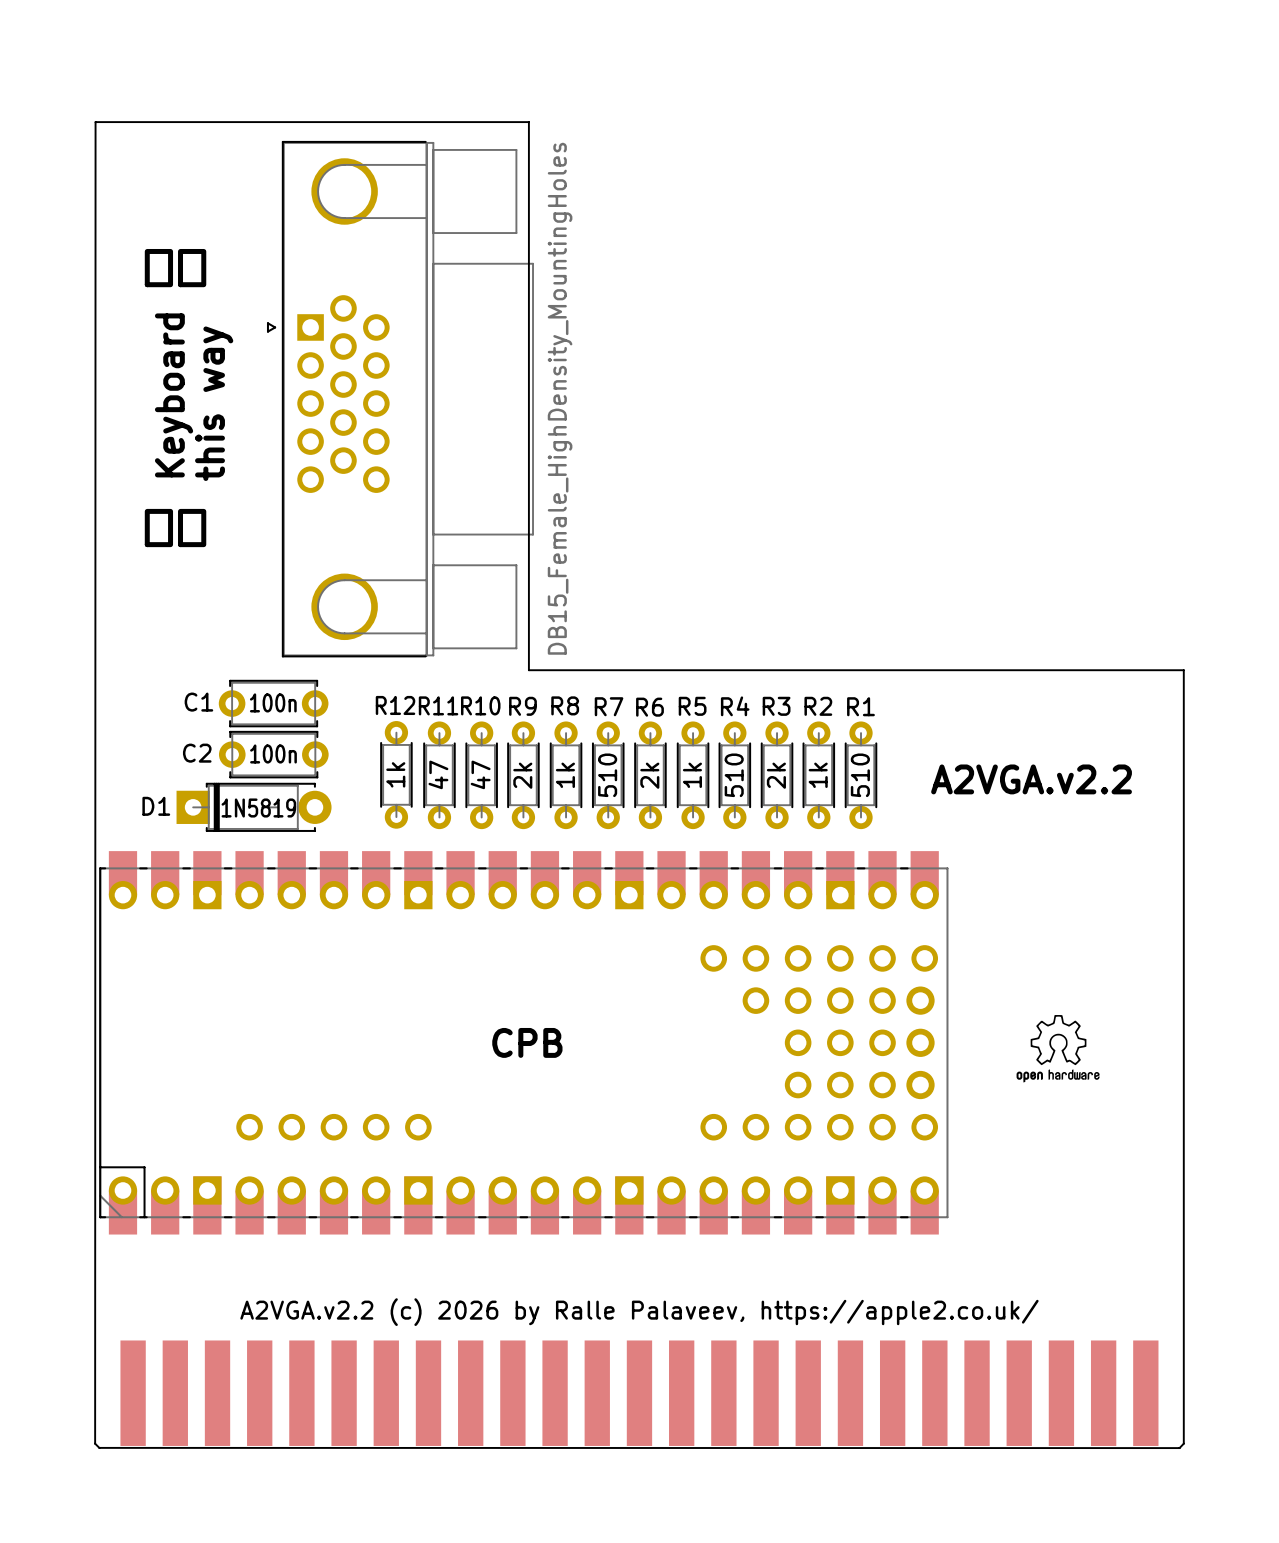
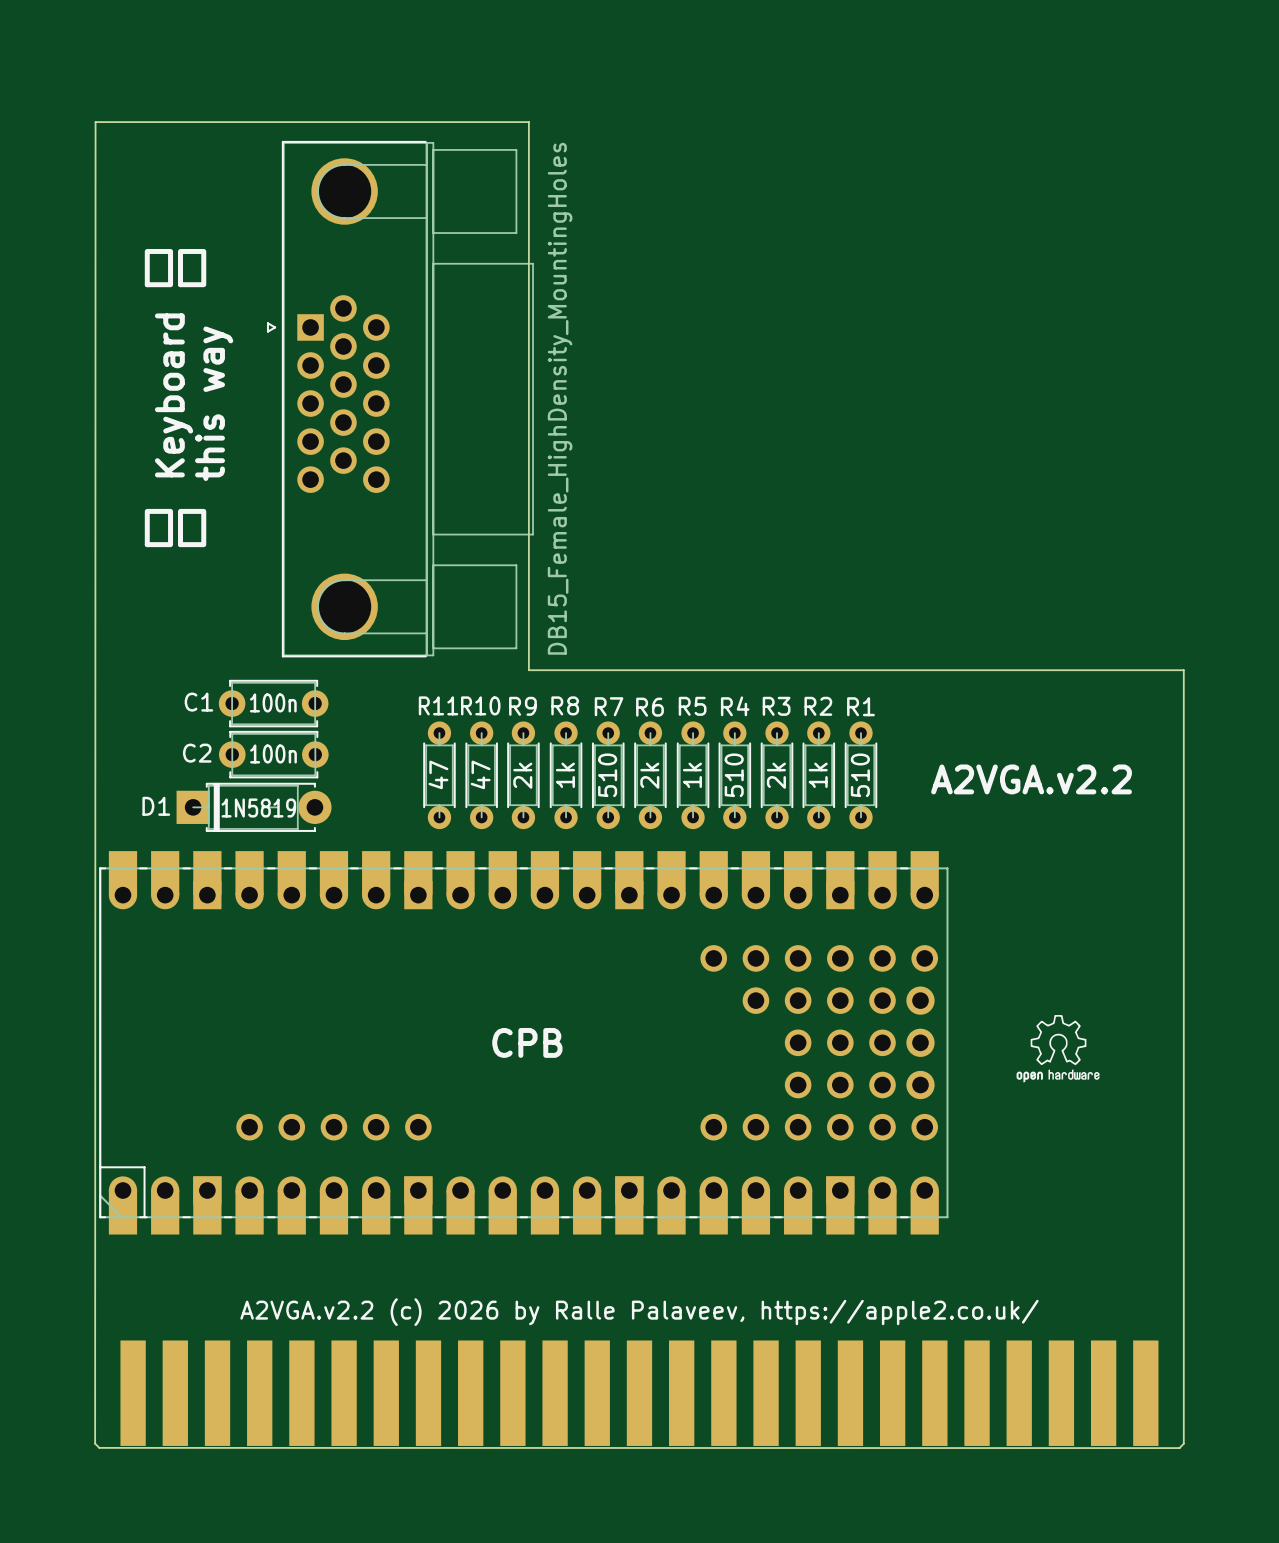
R12: 1k (396, 774) -> none

